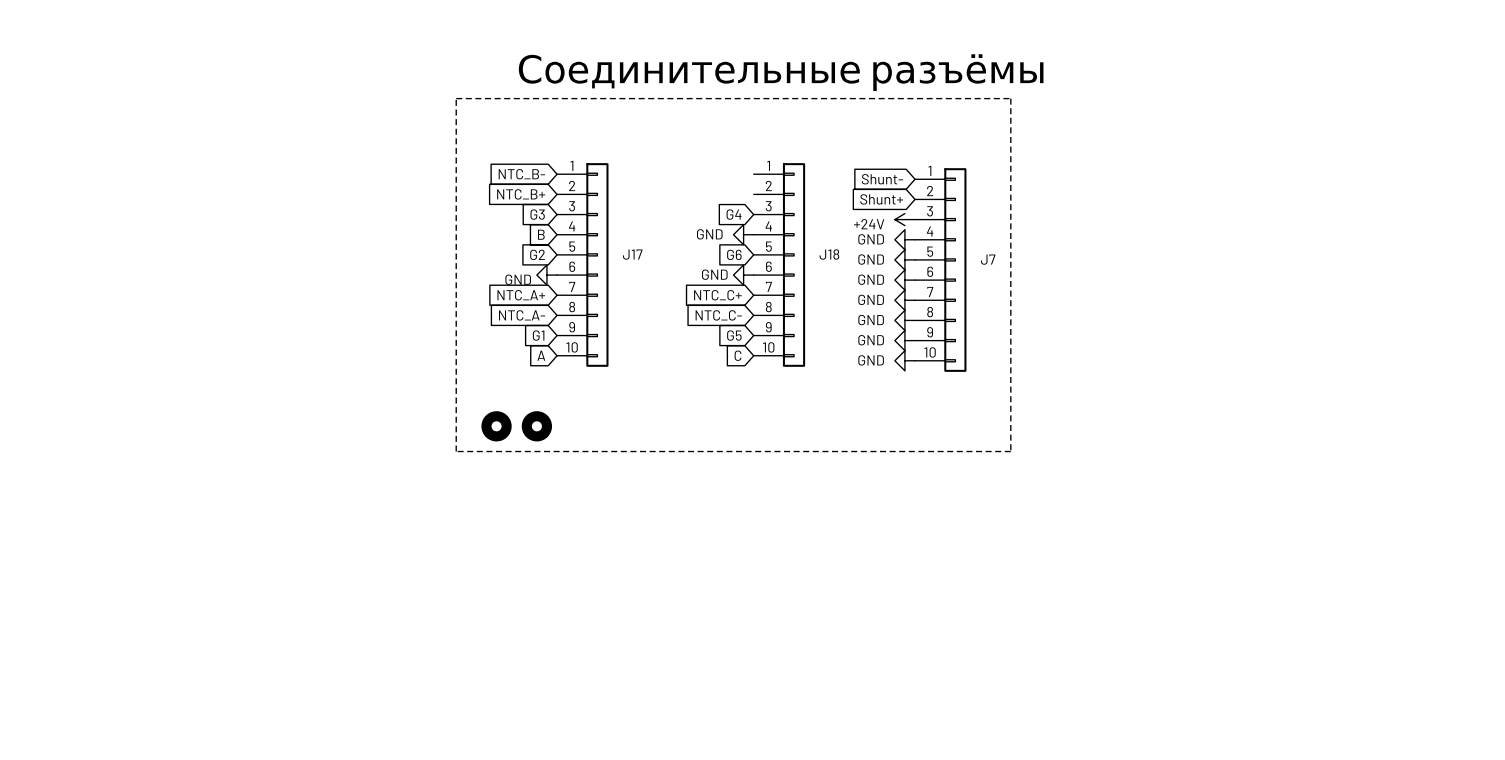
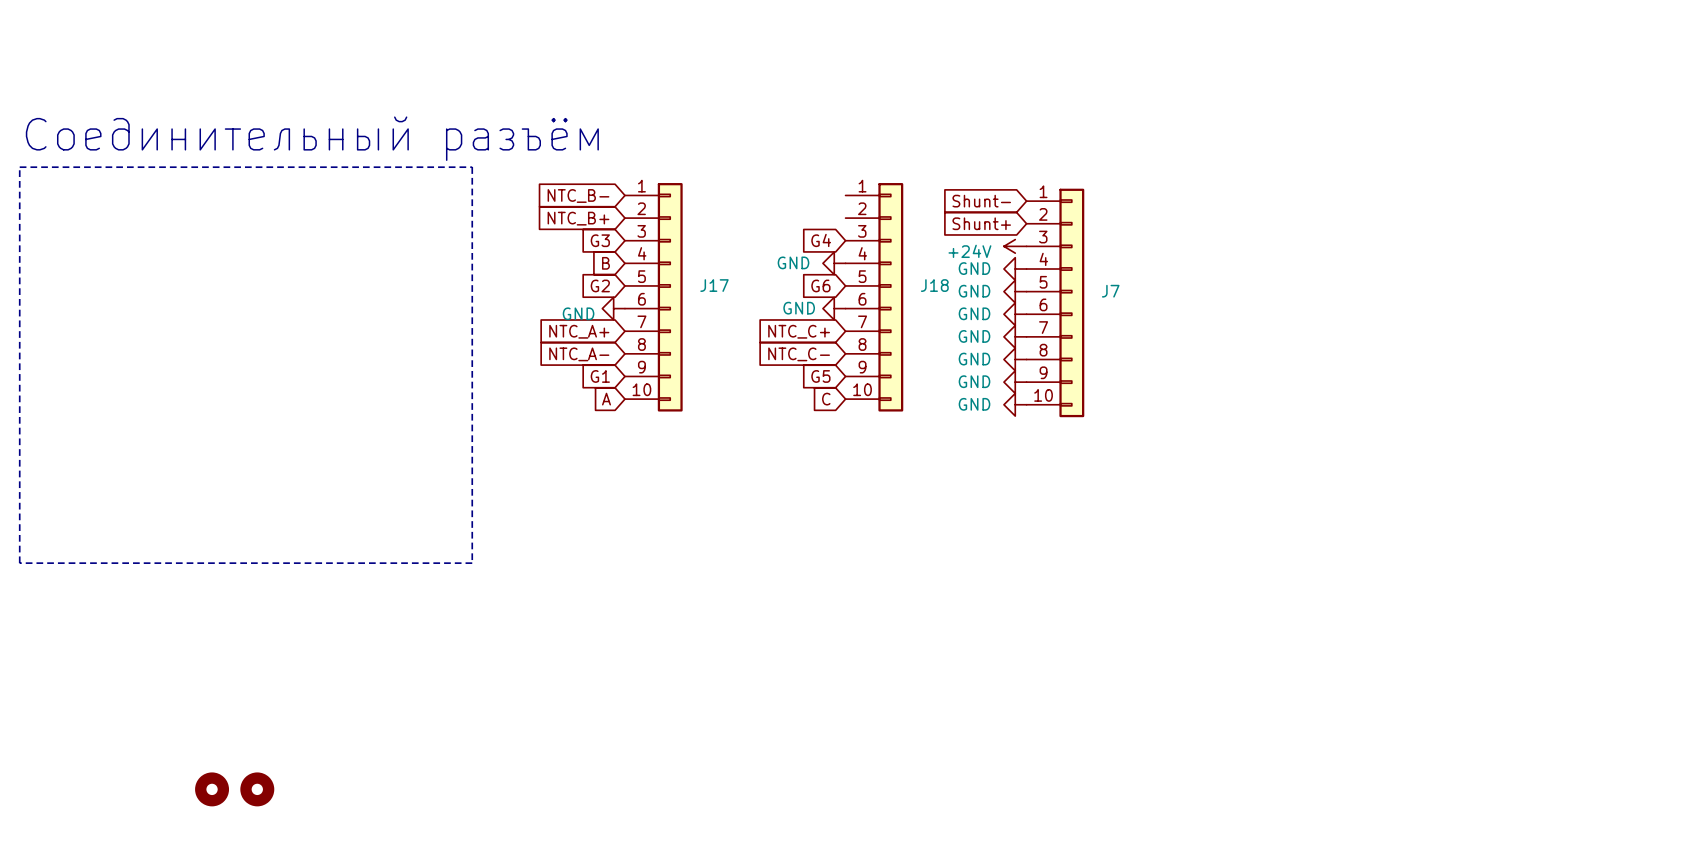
text: Соединительные разъёмы (781, 72) -> none
line: (456, 98) (1010, 98) (1010, 451) (456, 451) (456, 98) -> none
text: none -> Соединительный разъём (312, 138)
line: none -> (19, 167) (472, 167) (472, 563) (19, 563) (19, 167)
part: (496, 426) -> none
part: (536, 426) -> none
part: none -> (212, 789)
part: none -> (257, 789)

